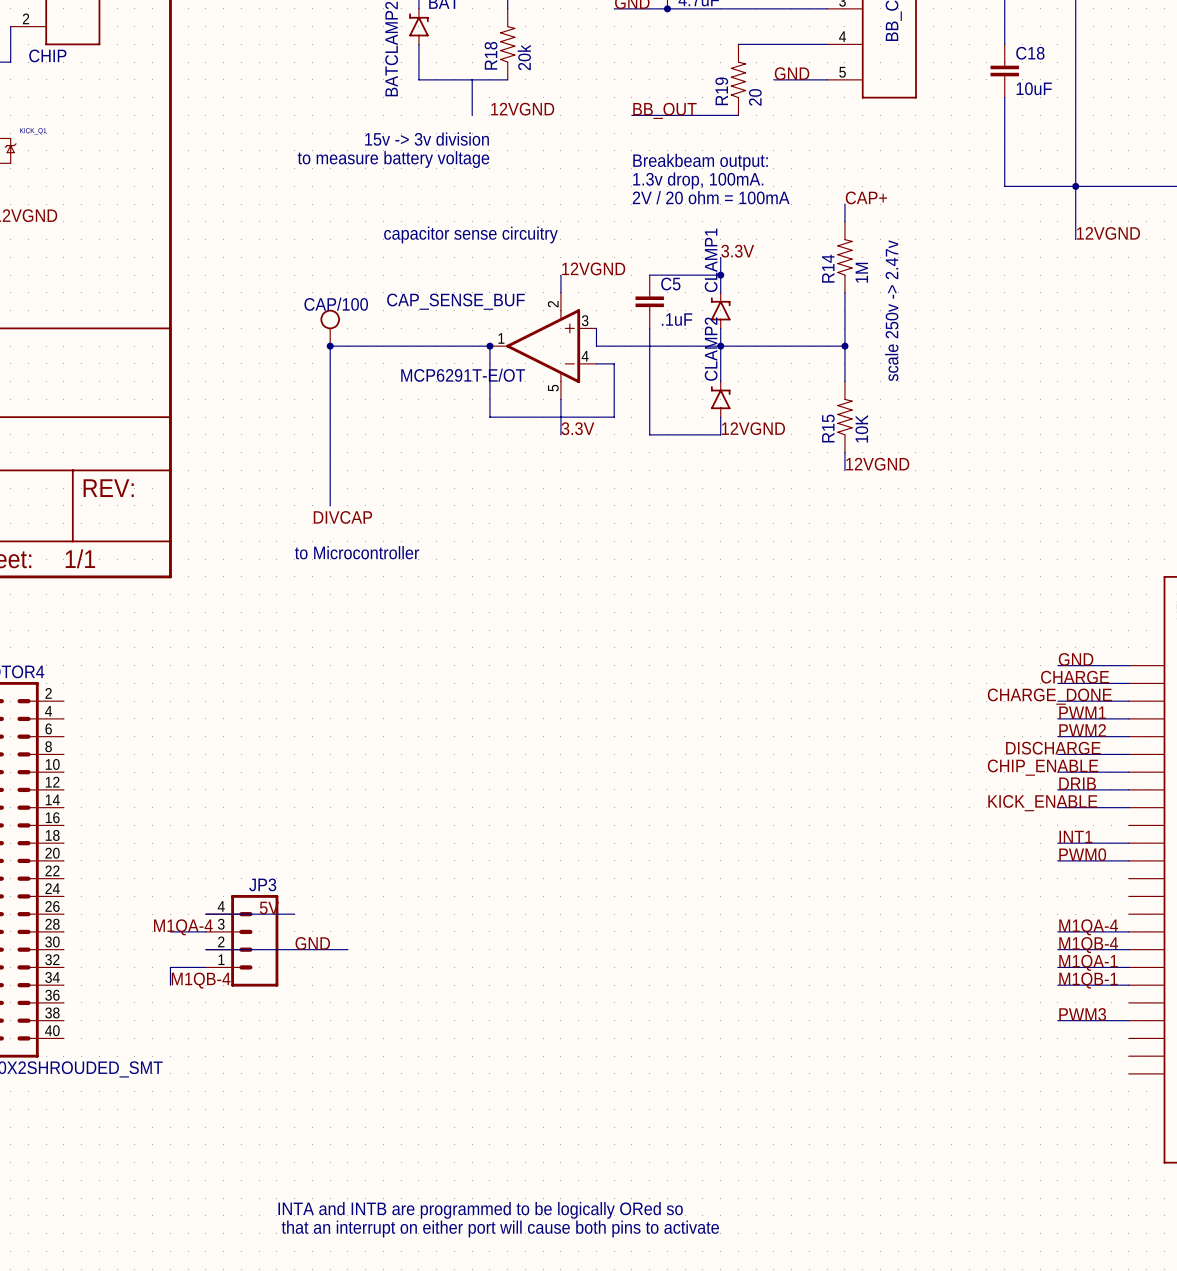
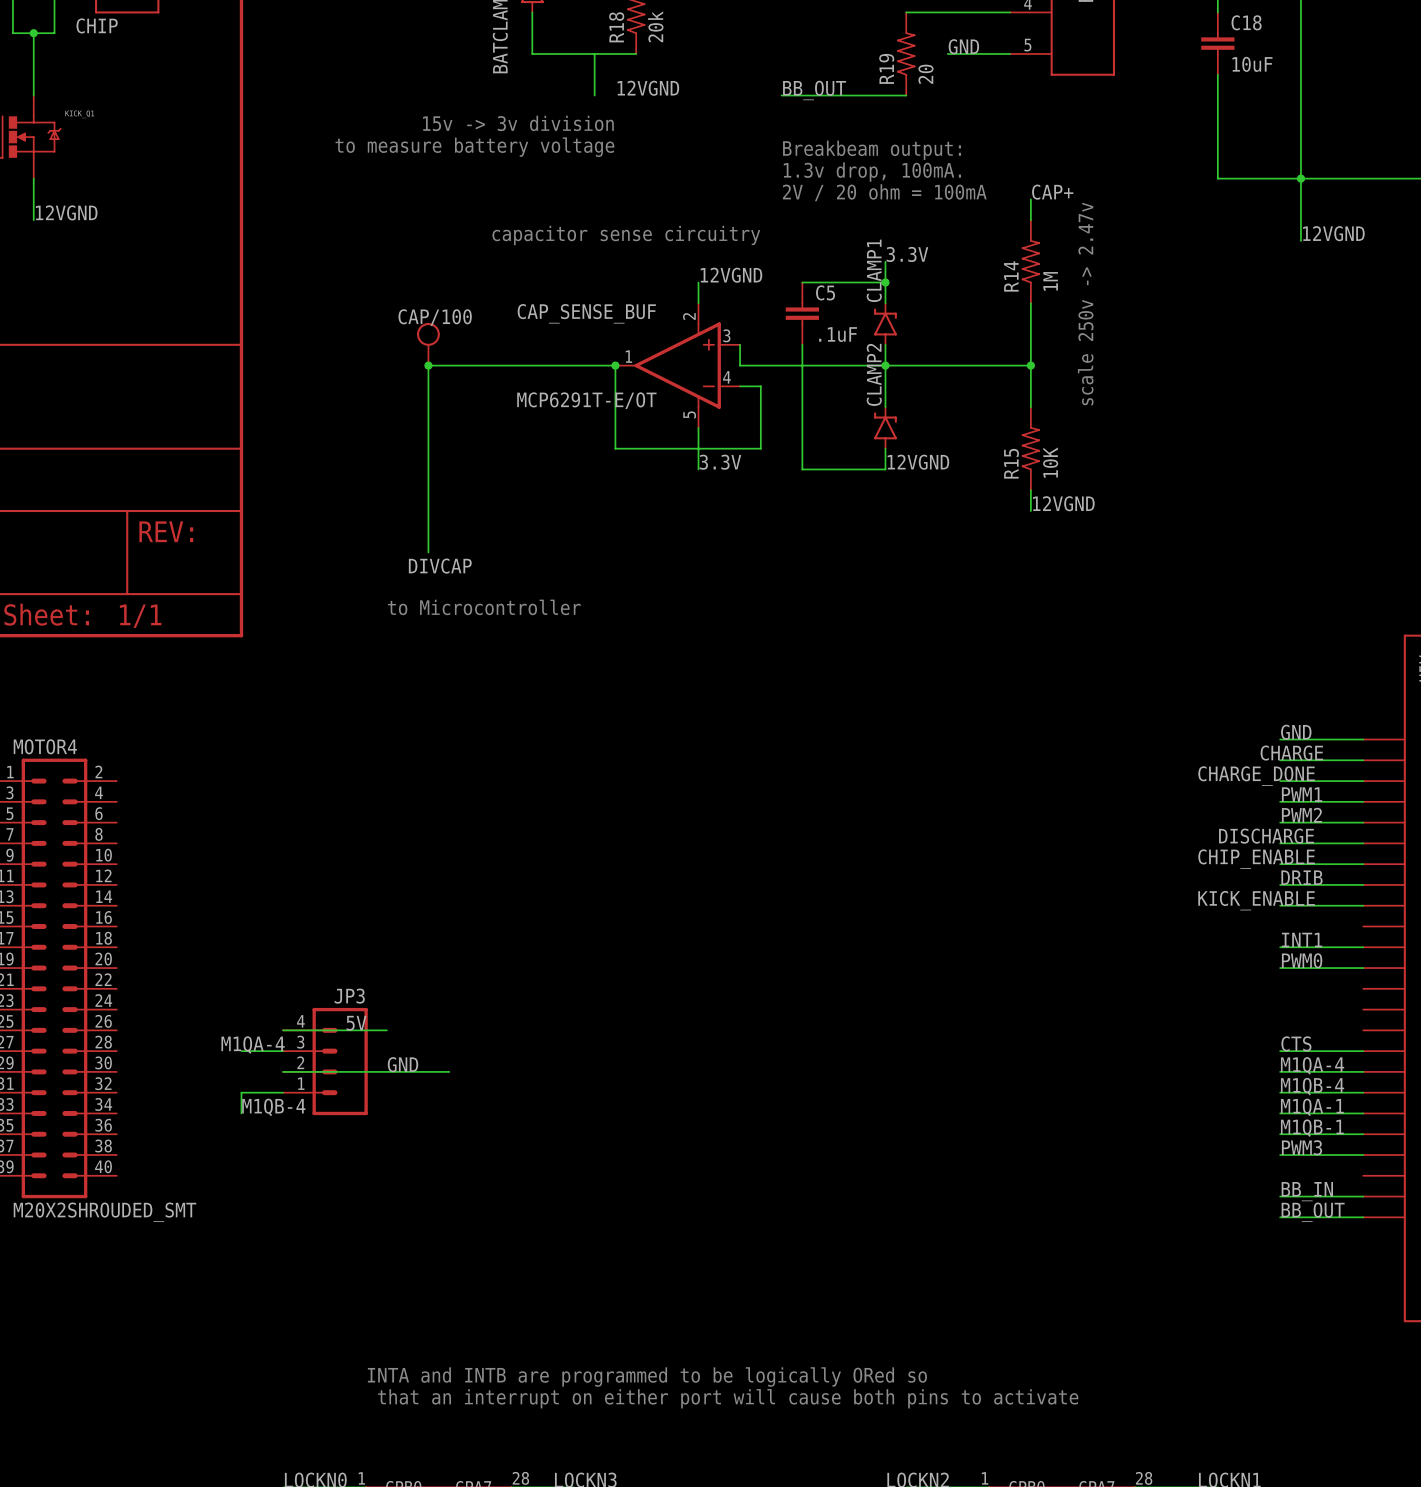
label: M1QA-4 (1088, 927) -> CTS (1296, 1043)
label: M1QB-4 (1088, 945) -> M1QA-4 (1312, 1065)
label: M1QA-1 (1088, 962) -> M1QB-4 (1312, 1086)
label: M1QB-1 (1088, 980) -> M1QA-1 (1312, 1107)
label: none -> M1QB-1 (1312, 1128)
wire: none -> (1280, 1134) (1363, 1134)
label: none -> BB_IN (1307, 1191)
wire: none -> (1280, 1196) (1363, 1196)
label: none -> BB_OUT (1313, 1212)
wire: none -> (1280, 1217) (1363, 1217)

